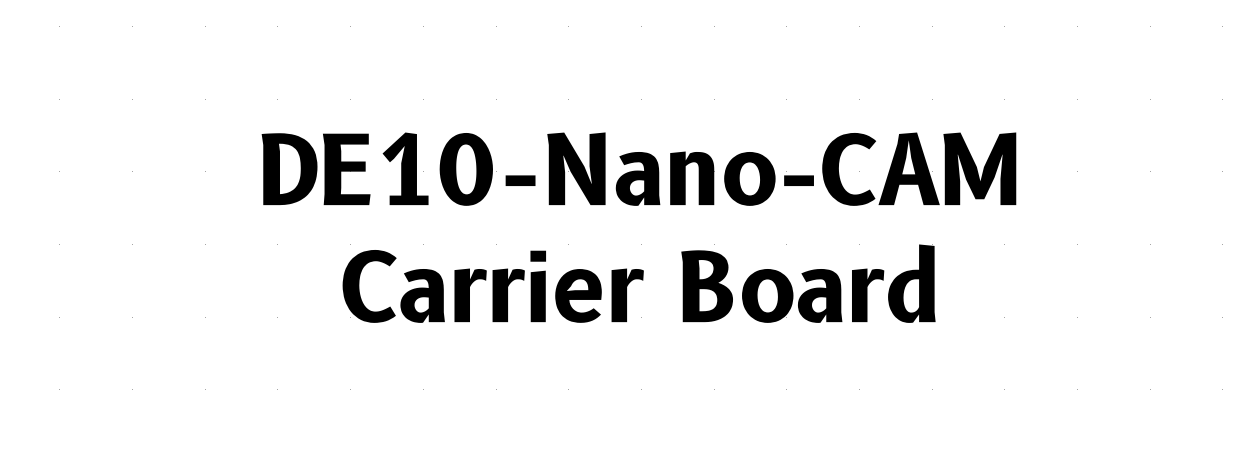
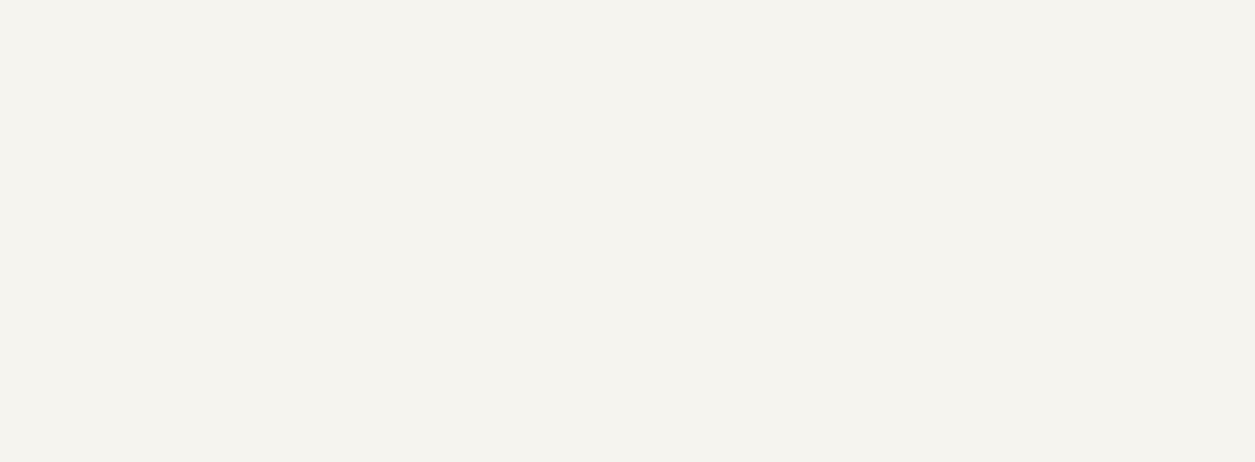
text: DE10-Nano-CAM (638, 169) -> none
text: Carrier Board (639, 283) -> none

